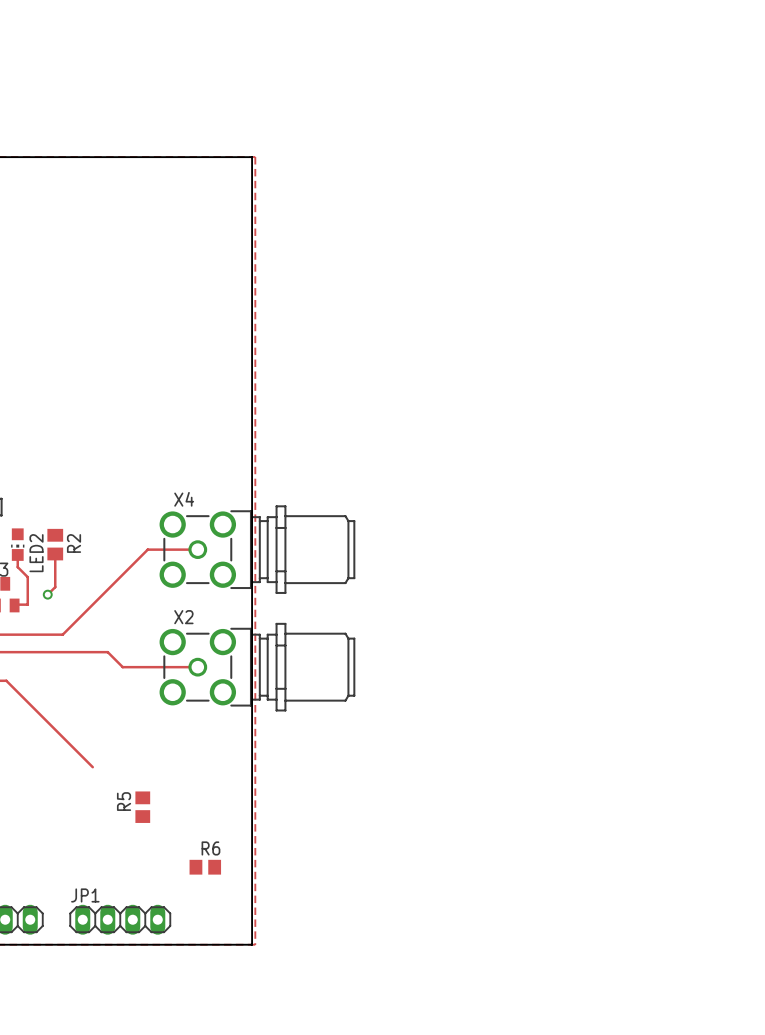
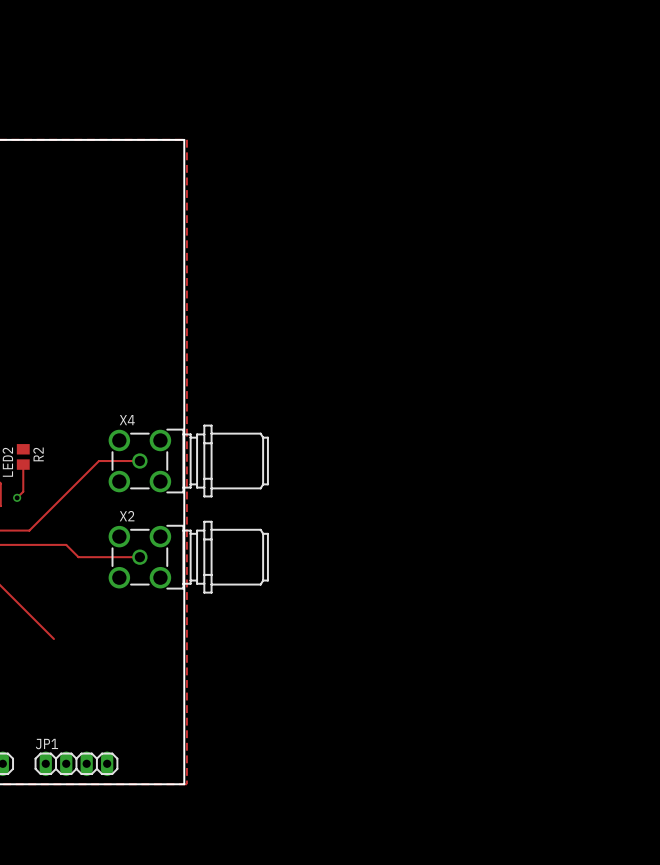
R5: (142, 807) -> none
R6: (205, 867) -> none

